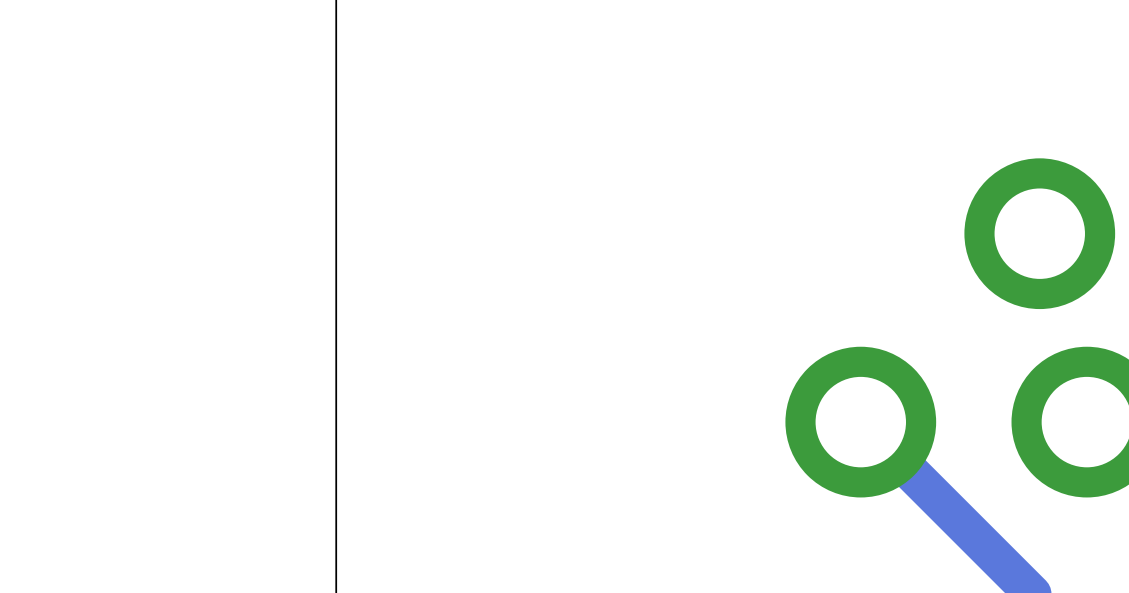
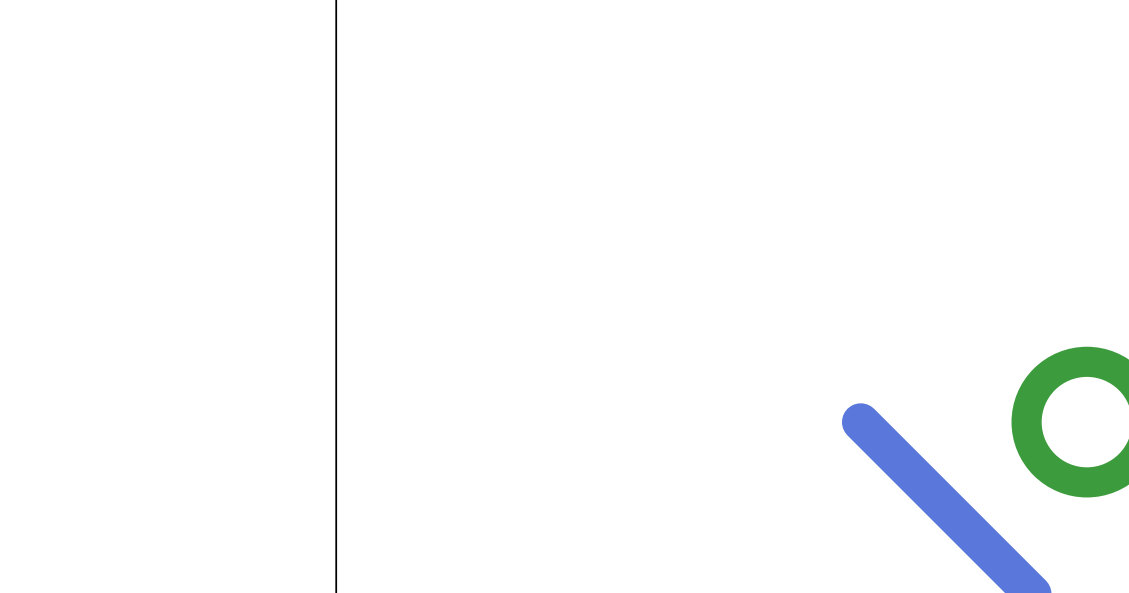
via: (1039, 233) -> none
via: (860, 422) -> none

